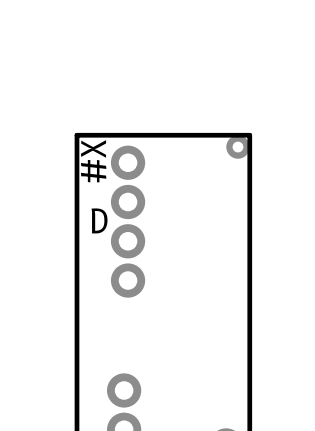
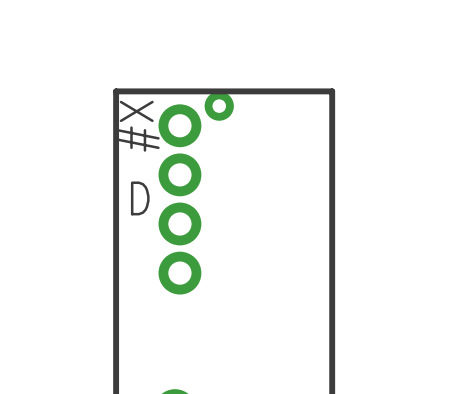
via position: (237, 147) -> (219, 106)

